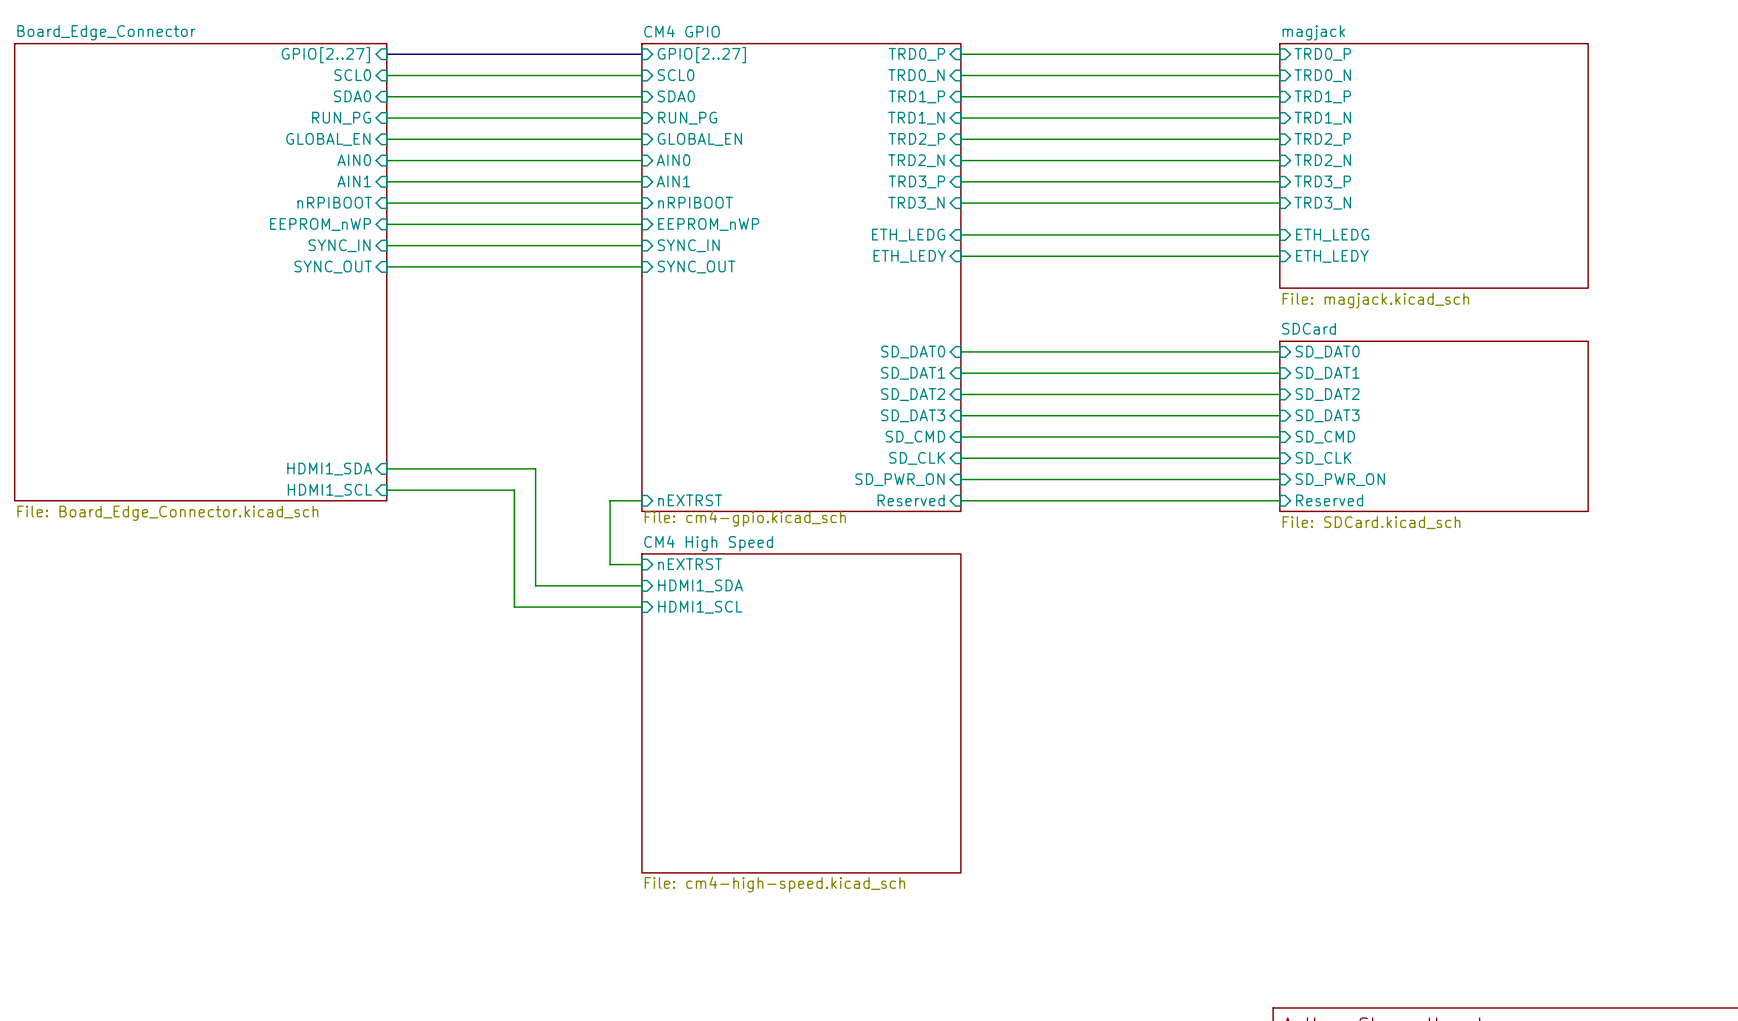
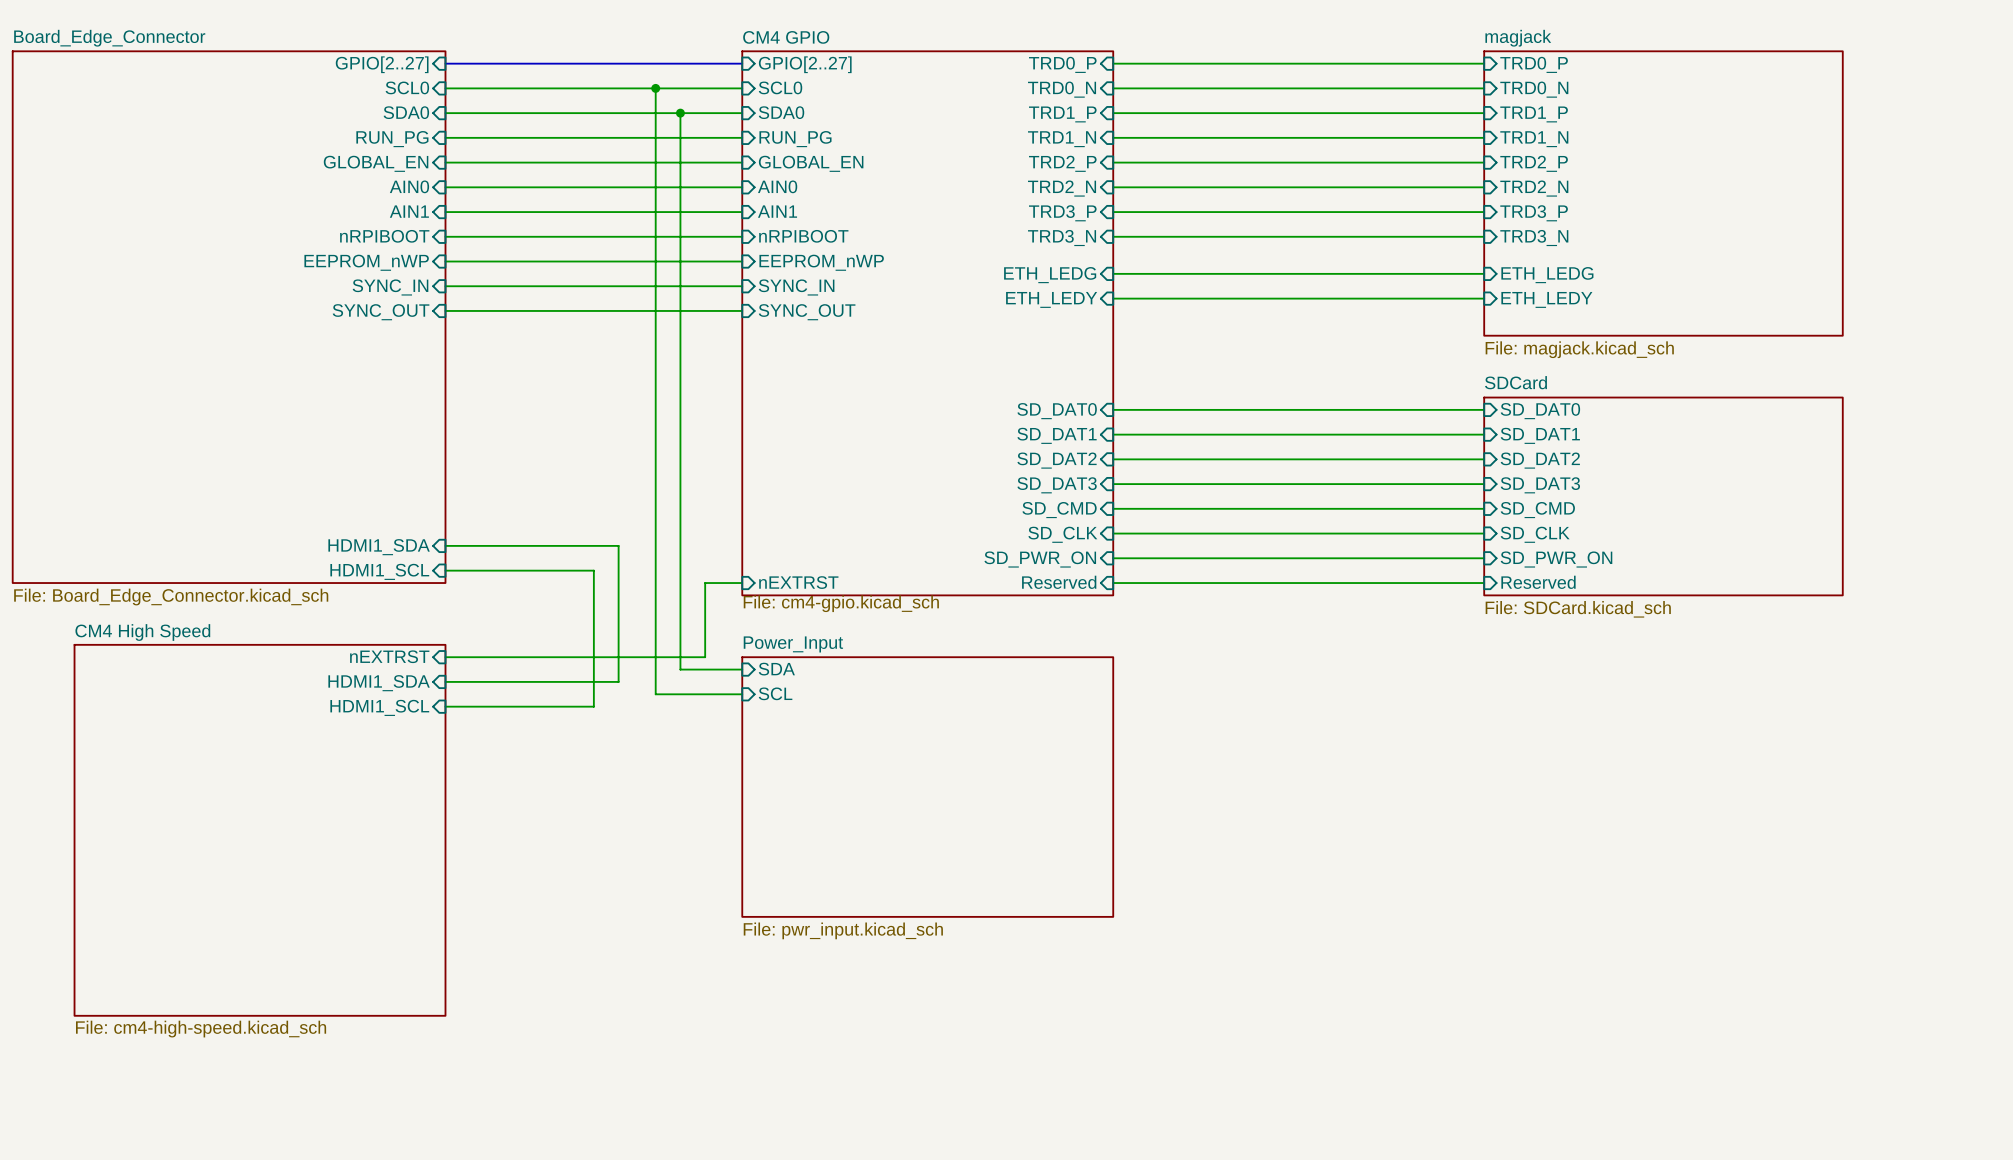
wire: none -> (655, 88) (655, 694) (742, 694)
junction: none -> (655, 88)
wire: none -> (680, 113) (680, 669) (742, 669)
junction: none -> (680, 113)
sheet pin: none -> nEXTRST (389, 656)
wire: (610, 564) (641, 564) -> (705, 657) (445, 657)
sheet pin: nEXTRST (690, 564) -> none
sheet pin: none -> SDA (776, 669)
sheet pin: none -> HDMI1_SDA (379, 683)
wire: (535, 585) (641, 585) -> (618, 681) (445, 681)
sheet pin: HDMI1_SDA (700, 585) -> none
sheet pin: none -> SCL (775, 693)
sheet pin: none -> HDMI1_SCL (379, 707)
wire: (514, 607) (641, 607) -> (593, 706) (445, 706)
sheet pin: HDMI1_SCL (700, 607) -> none
sheet Power_Input: none -> File: pwr_input.kicad_sch (927, 787)
sheet CM4 High Speed position: (801, 713) -> (260, 830)

